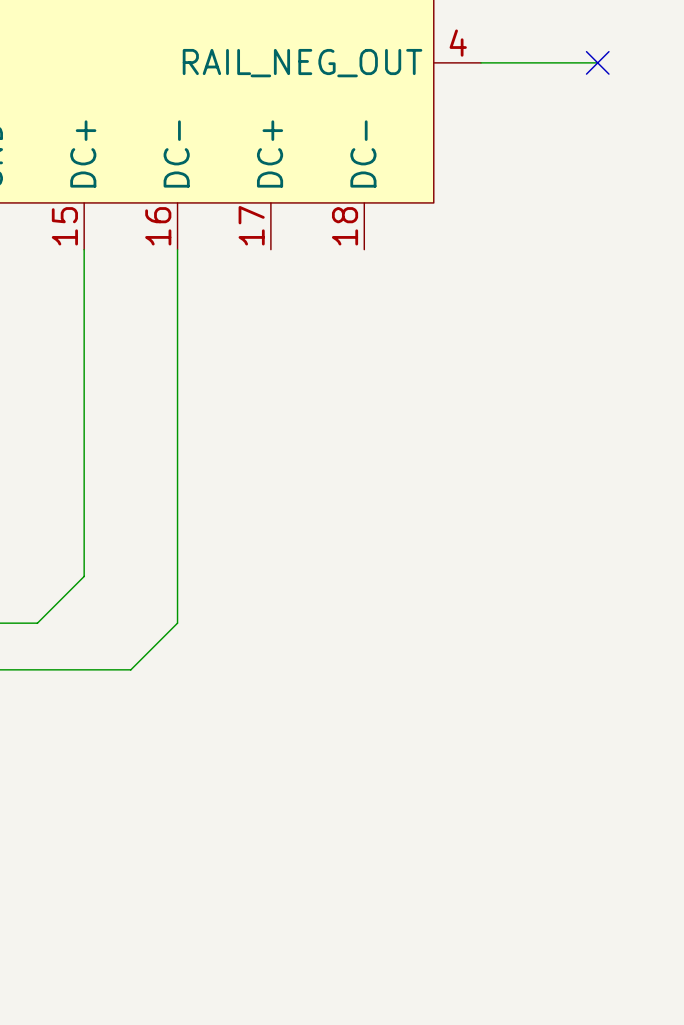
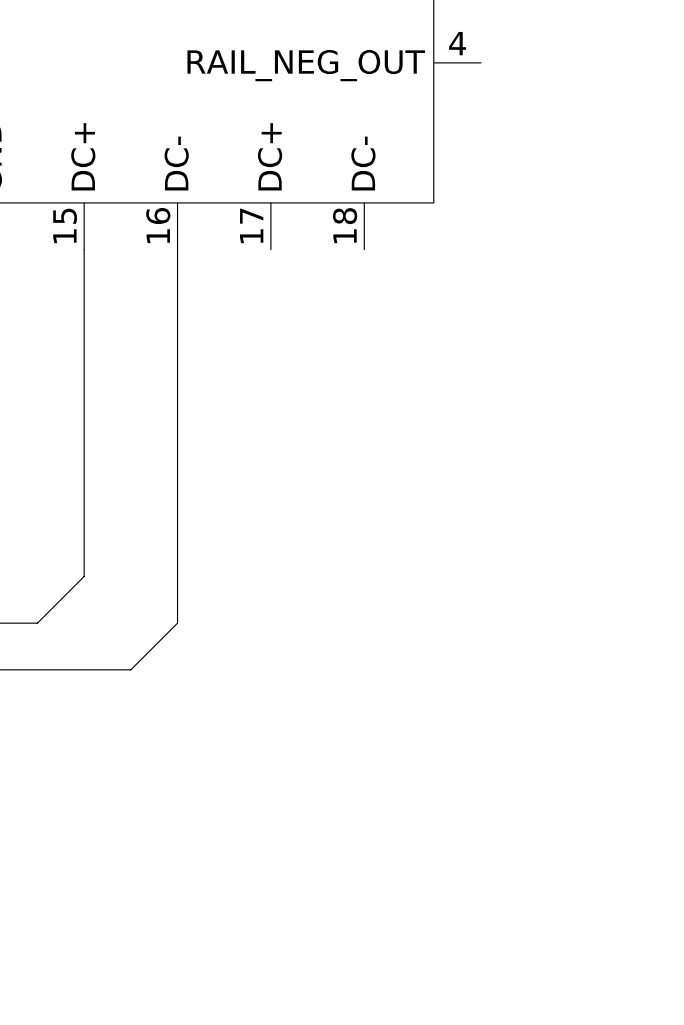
wire: (481, 62) (597, 62) -> none
no-connect mark: (597, 62) -> none

